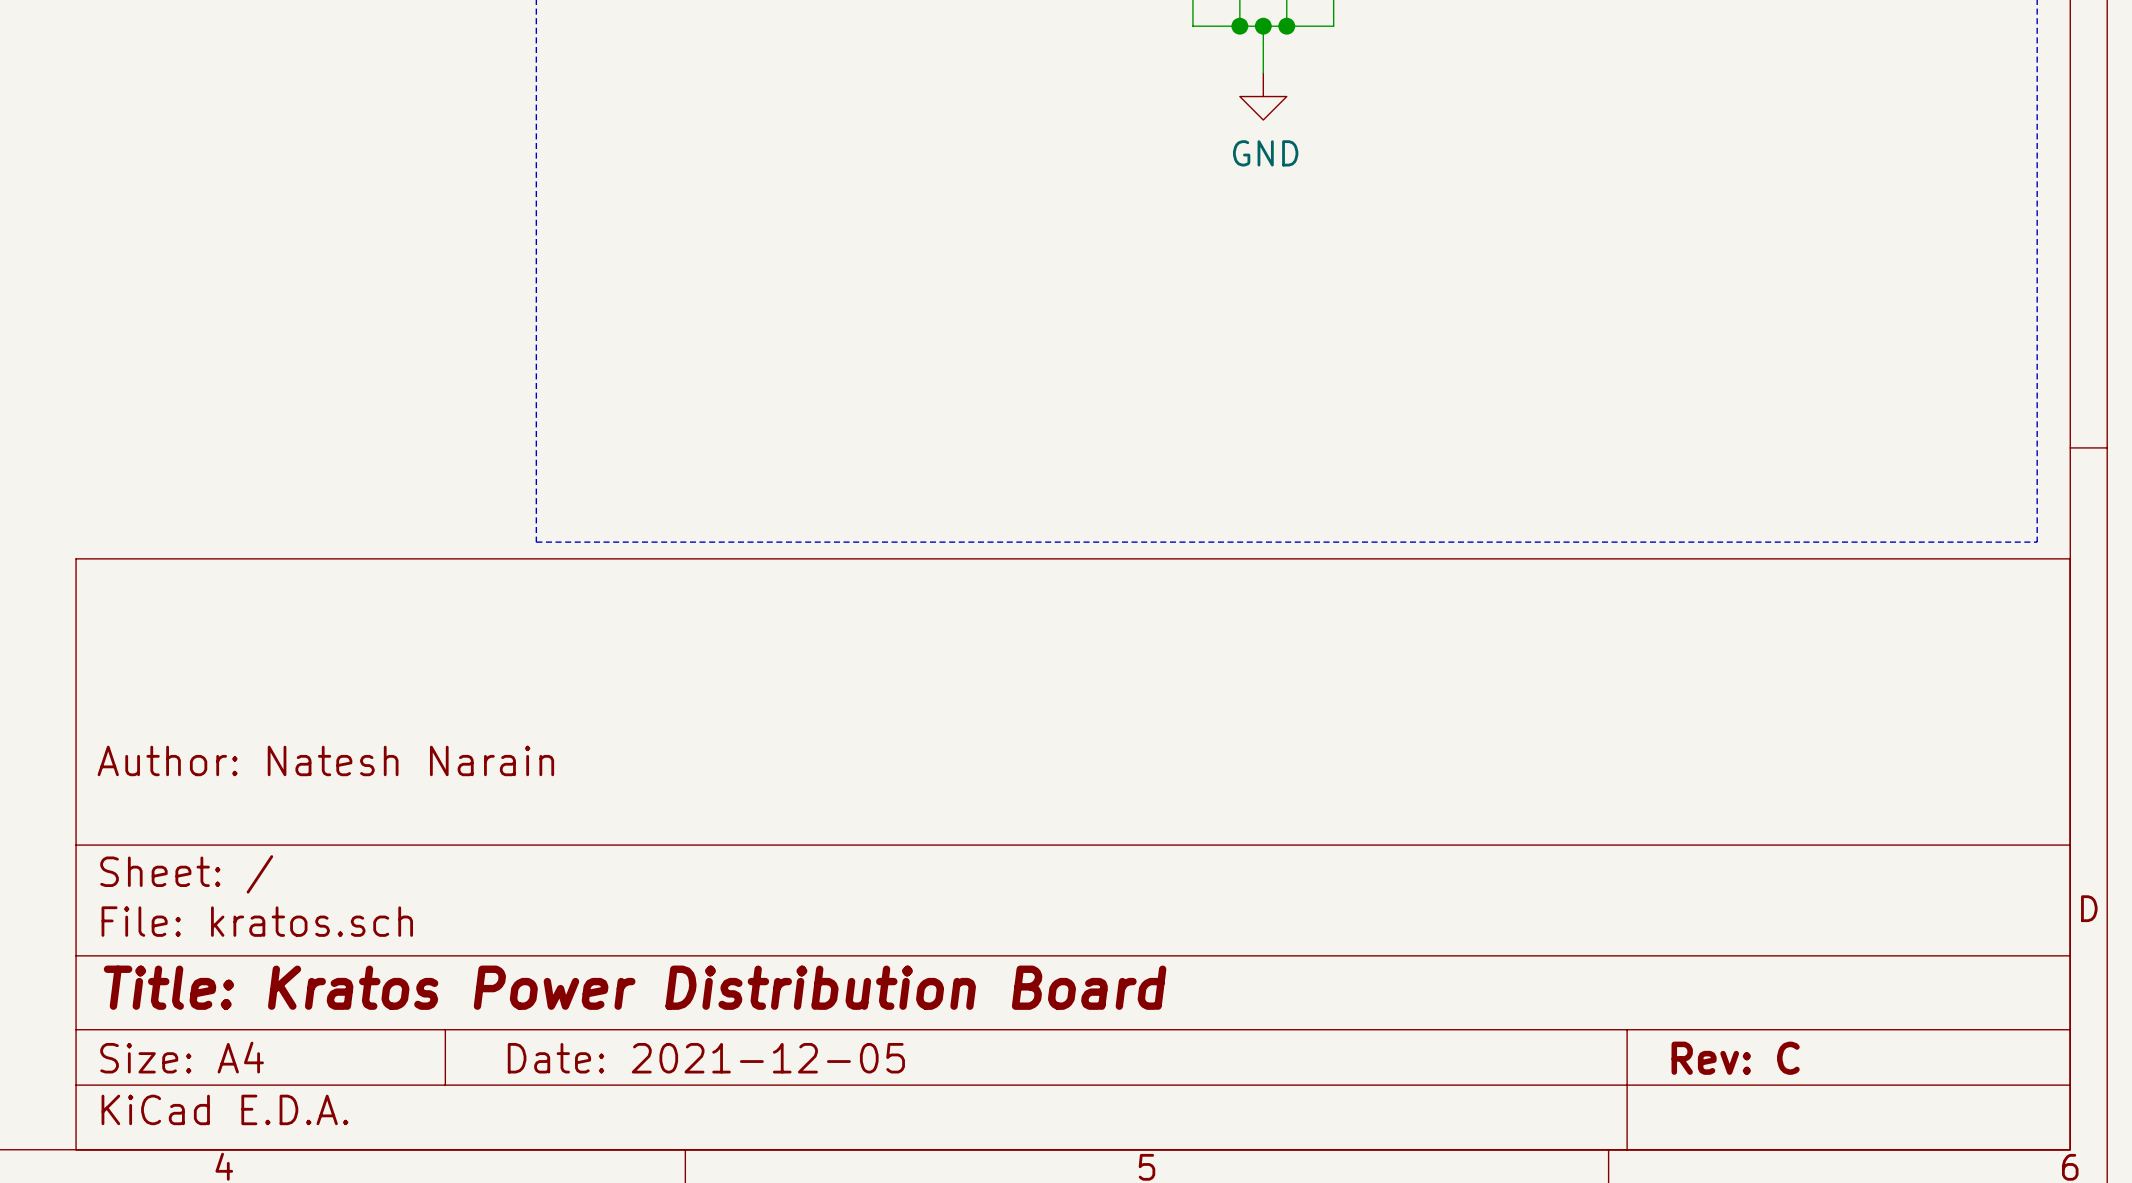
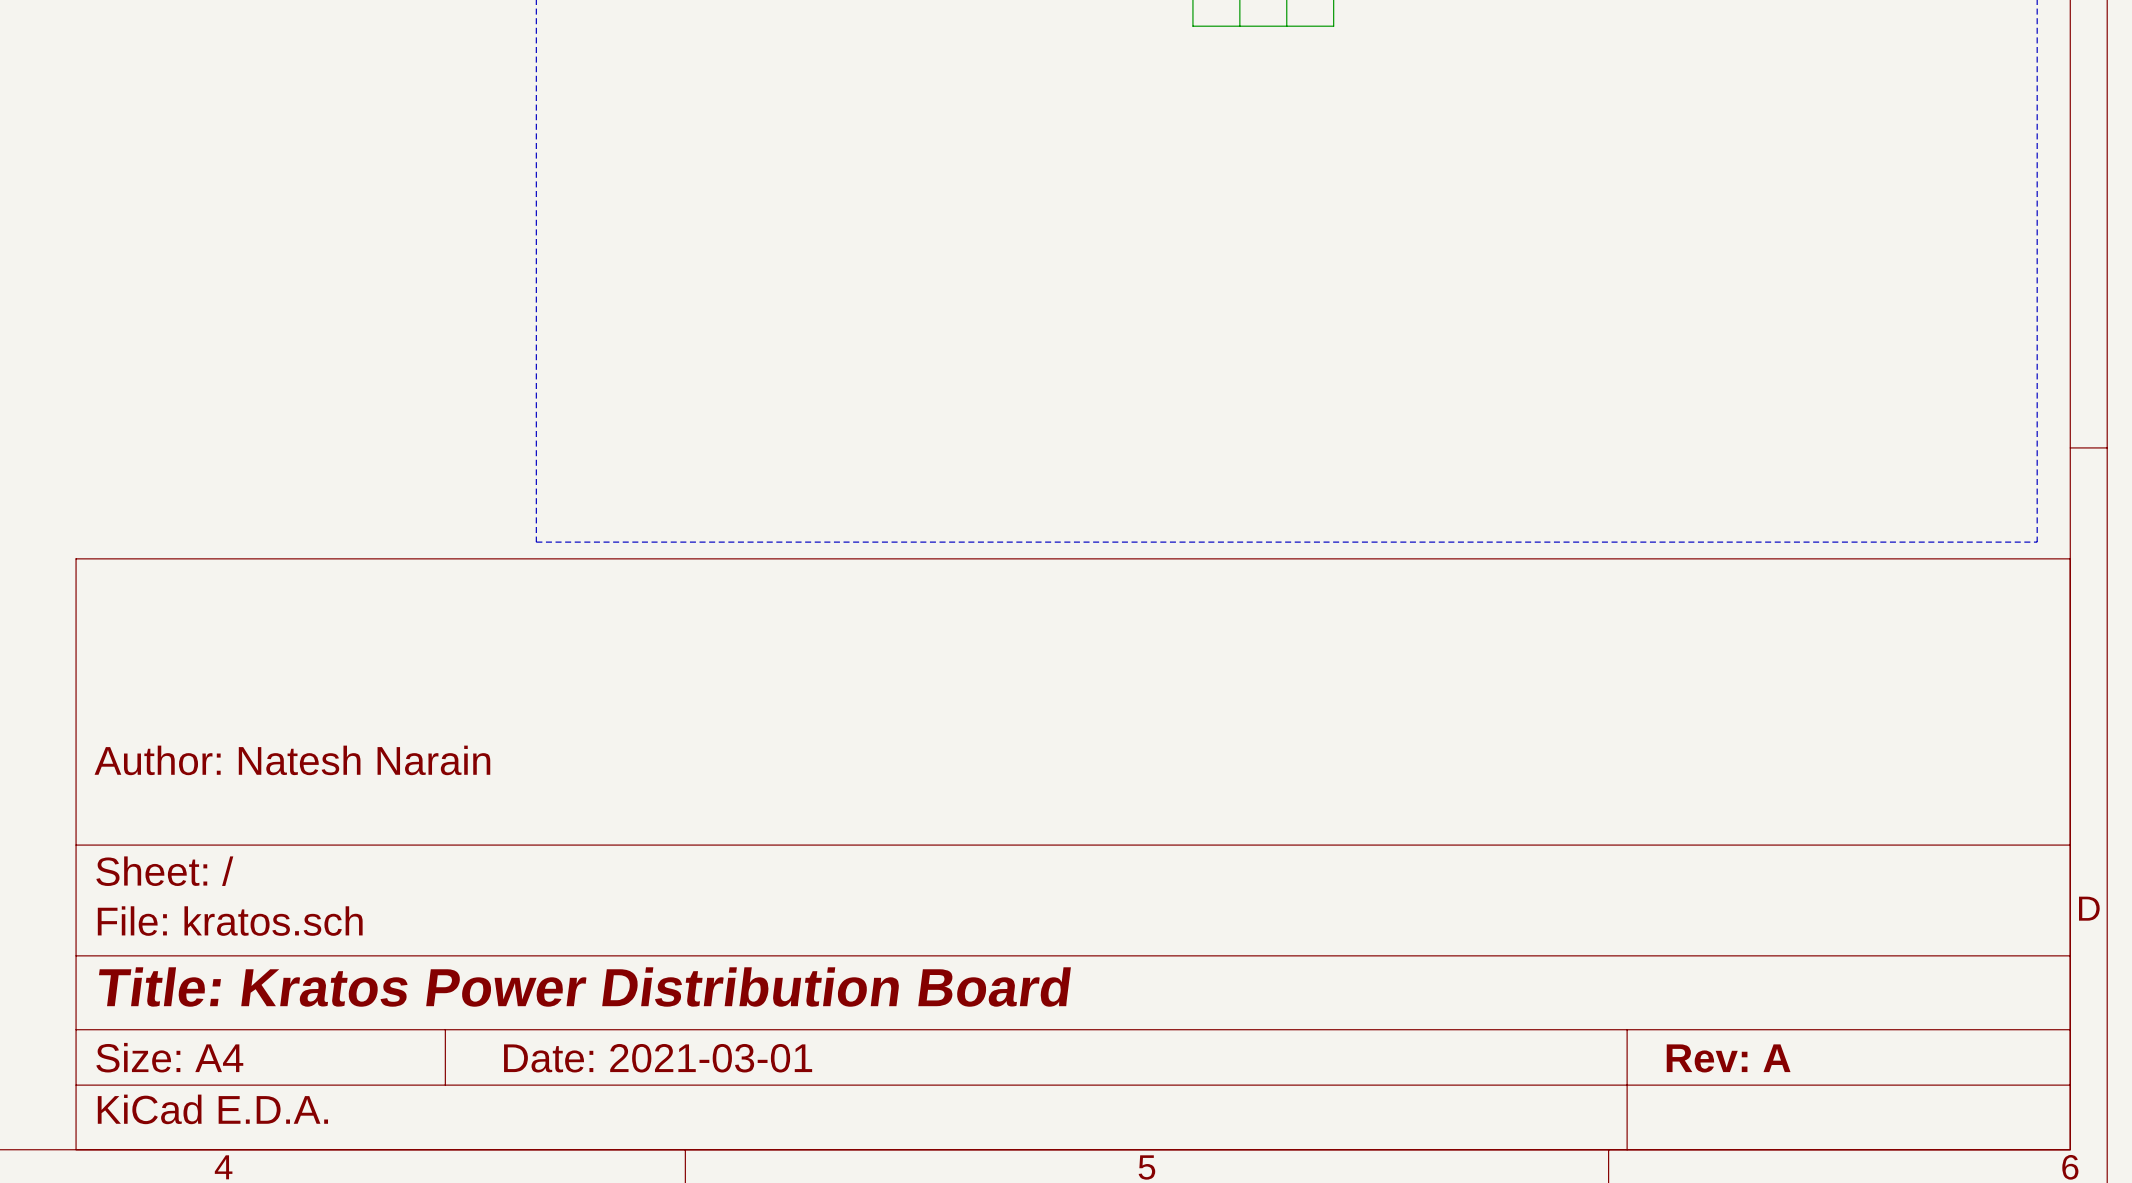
junction: (1239, 26) -> none
wire: (1263, 26) (1263, 73) -> none
junction: (1263, 26) -> none
junction: (1286, 26) -> none
power symbol: GND (1263, 96) -> none
title block: Date: 2021-12-05 (706, 1058) -> Date: 2021-03-01 (658, 1058)
title block: Rev: C (1735, 1058) -> Rev: A (1728, 1058)

